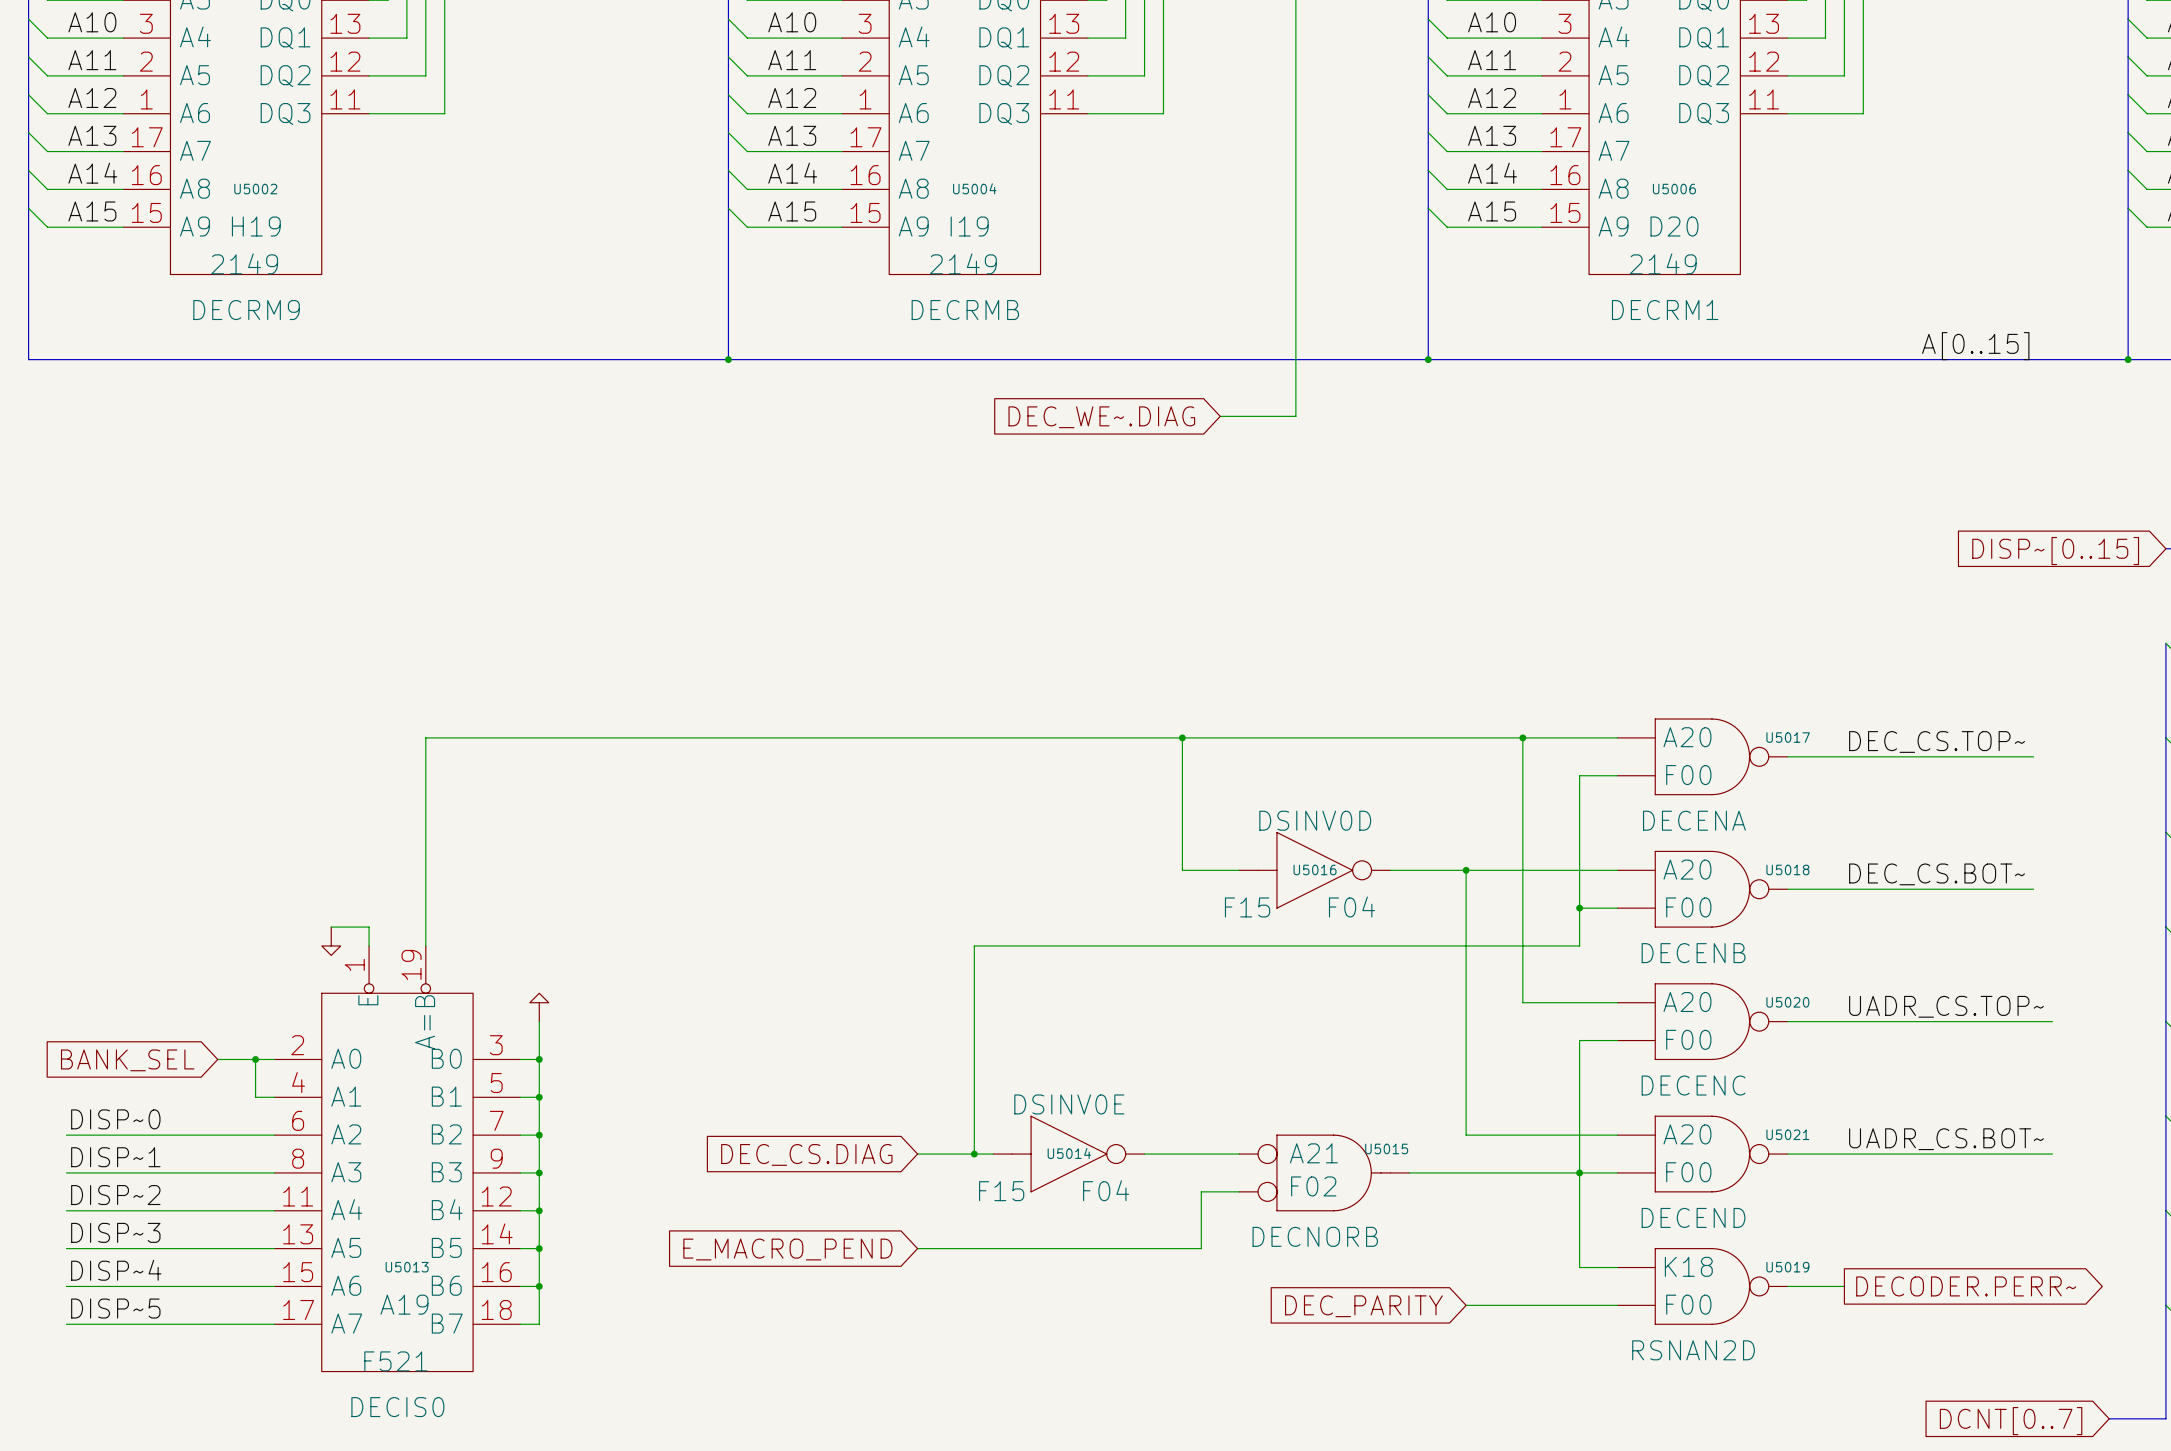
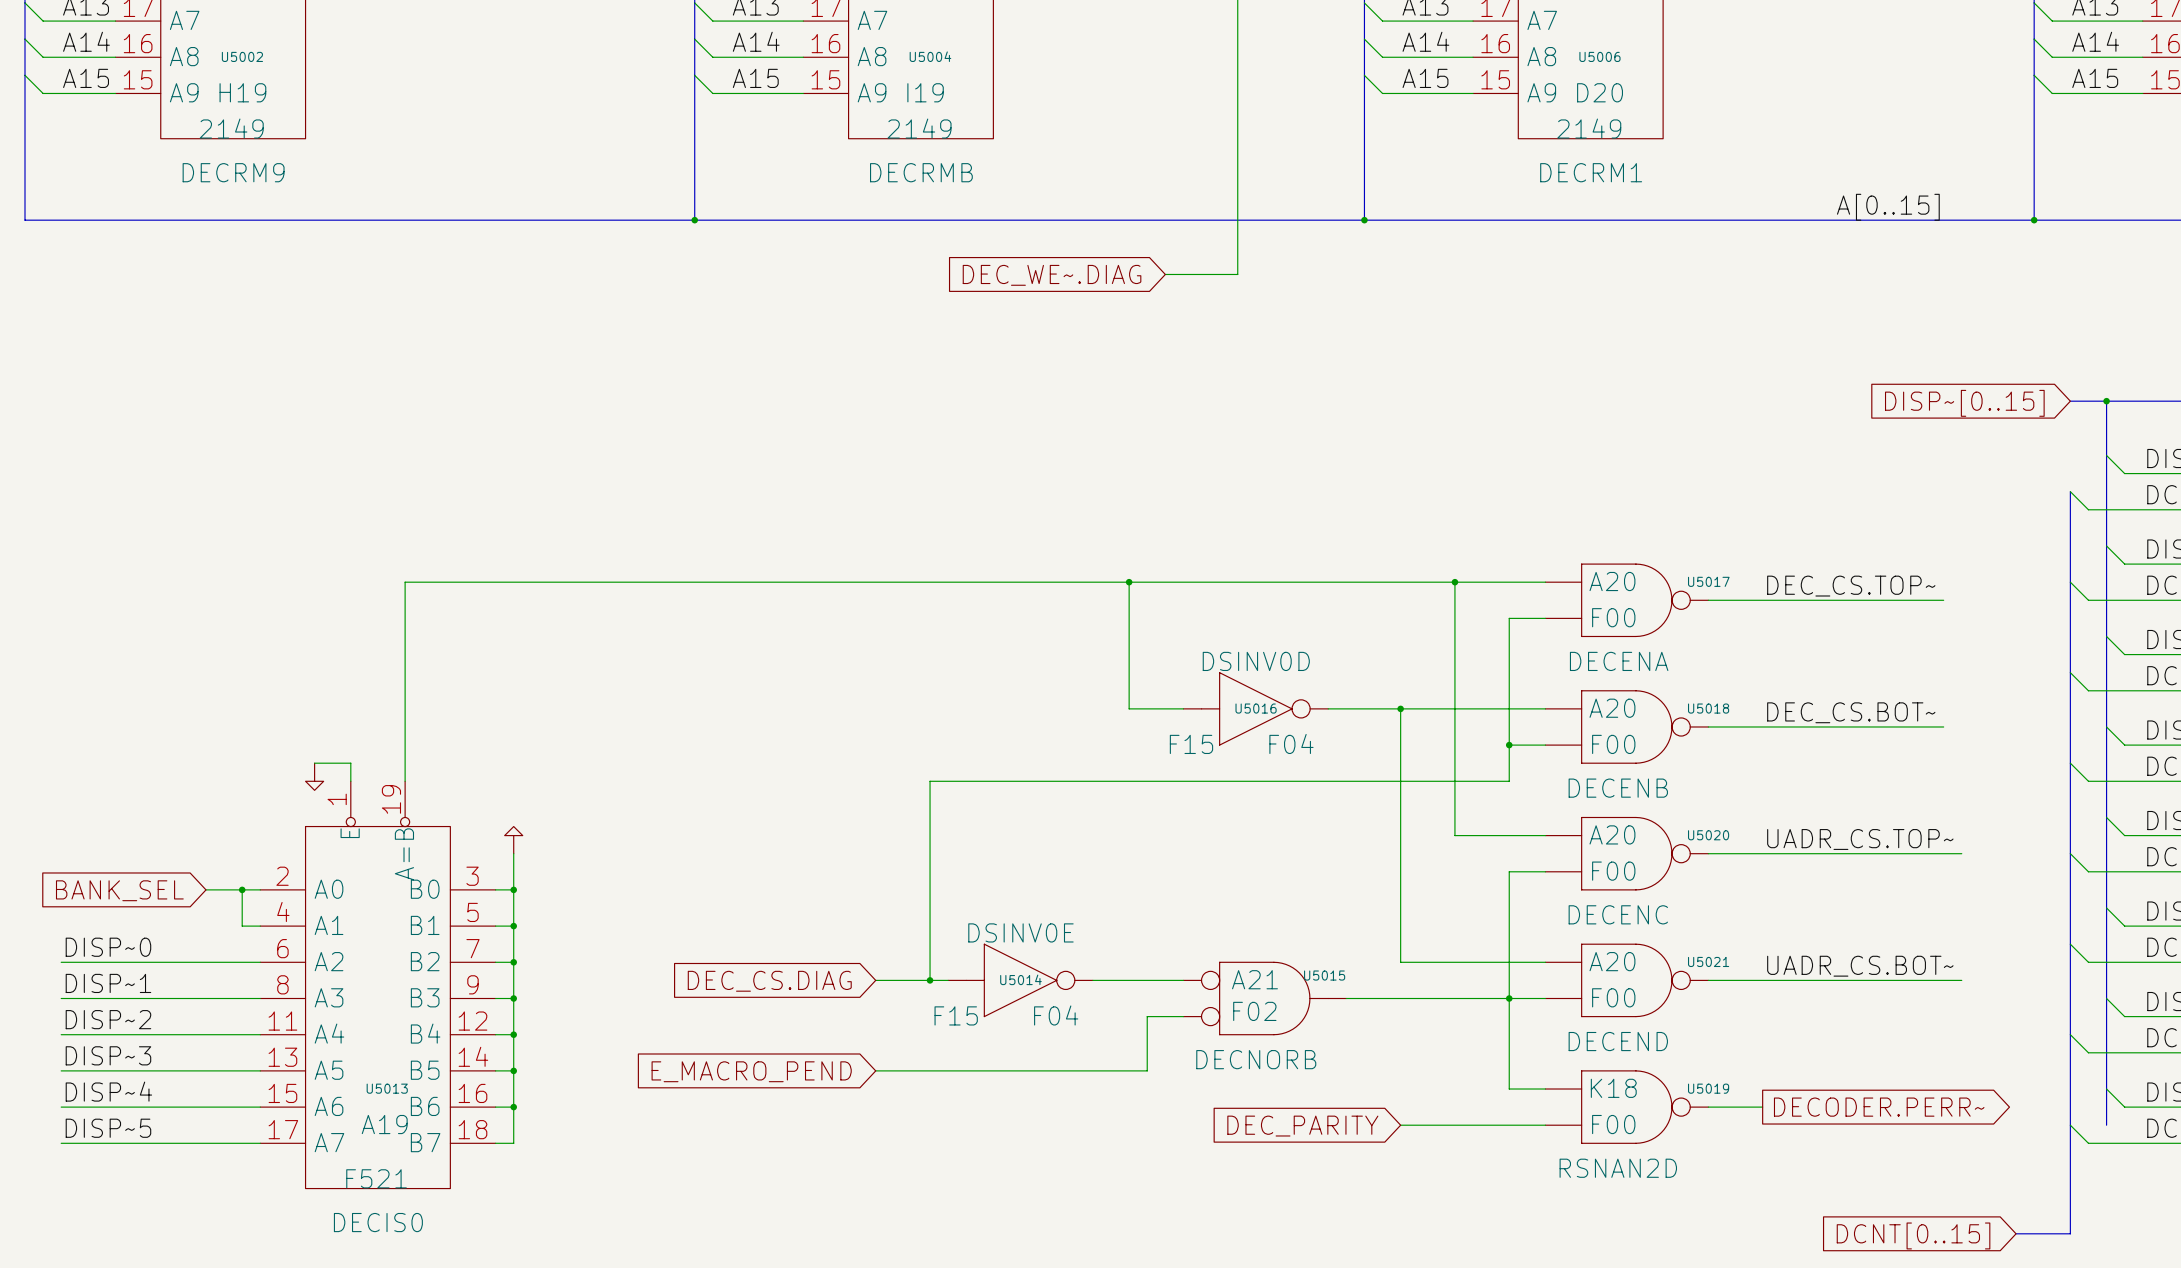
global label: DCNT[0..7] (2011, 1421) -> DCNT[0..15] (1913, 1235)

